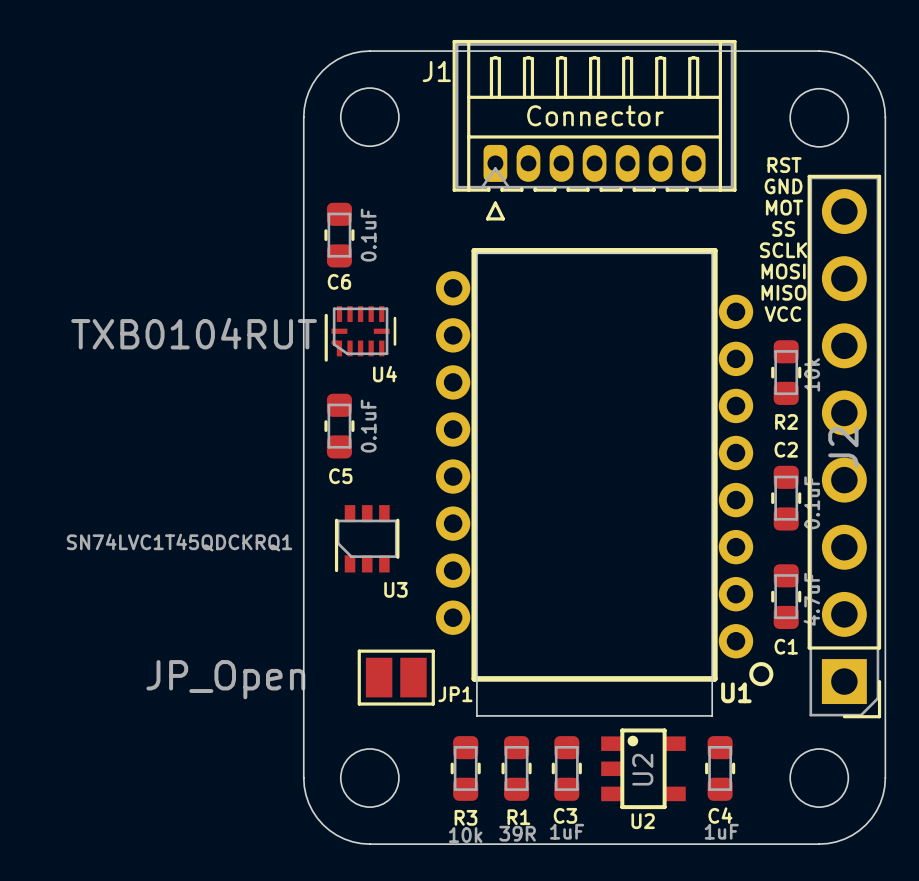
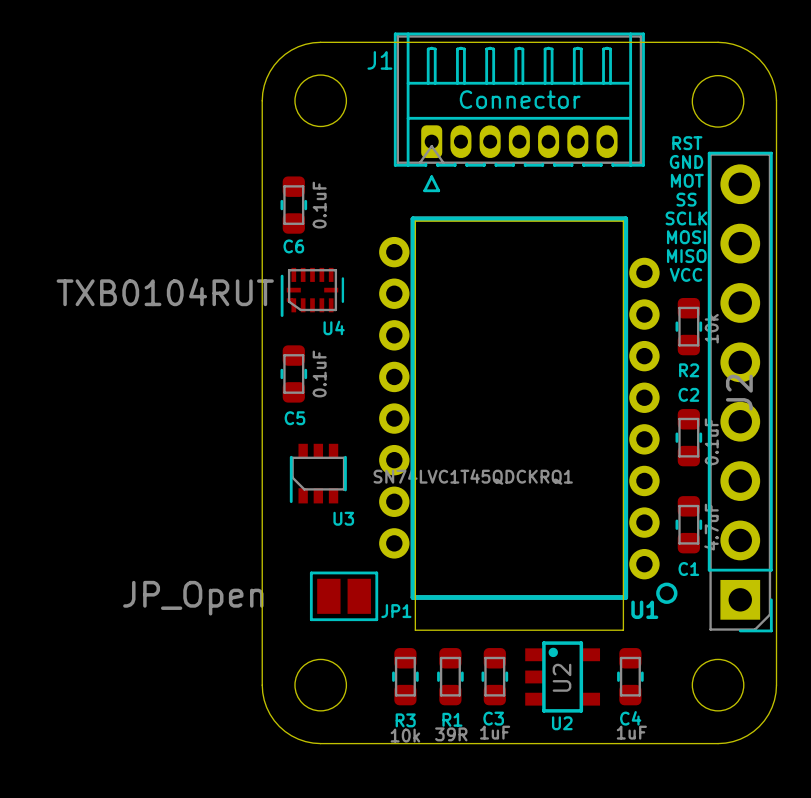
U3 value position: SN74LVC1T45QDCKRQ1 (179, 542) -> SN74LVC1T45QDCKRQ1 (473, 476)

